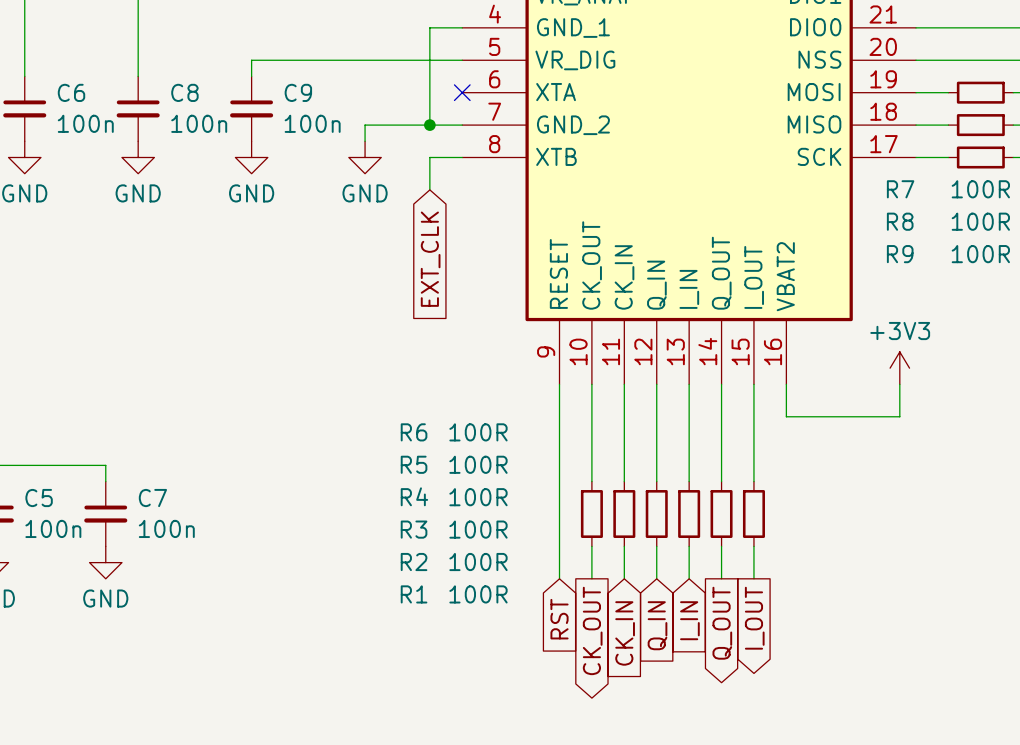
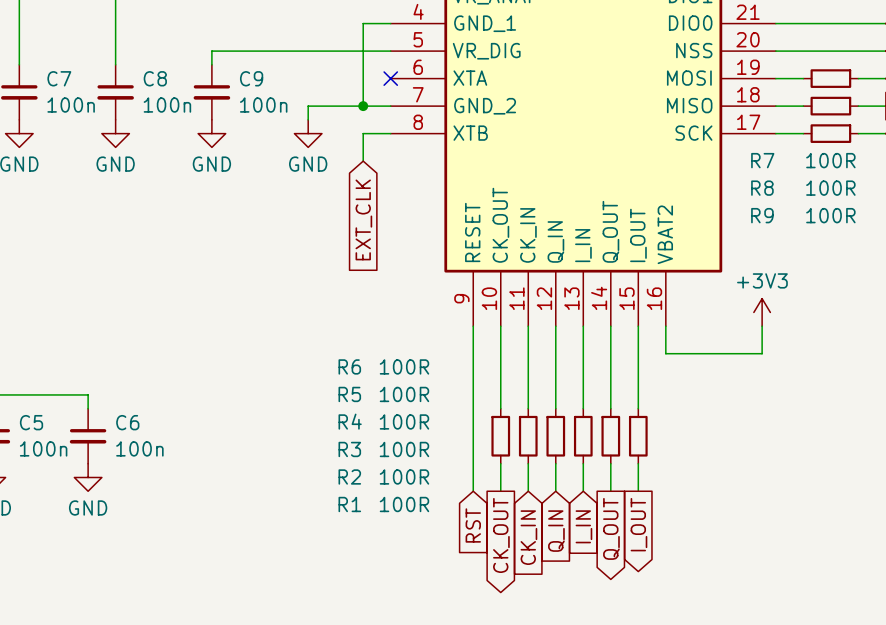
C6 name: C6 (71, 92) -> C7 (59, 78)
C7 name: C7 (152, 498) -> C6 (127, 422)

